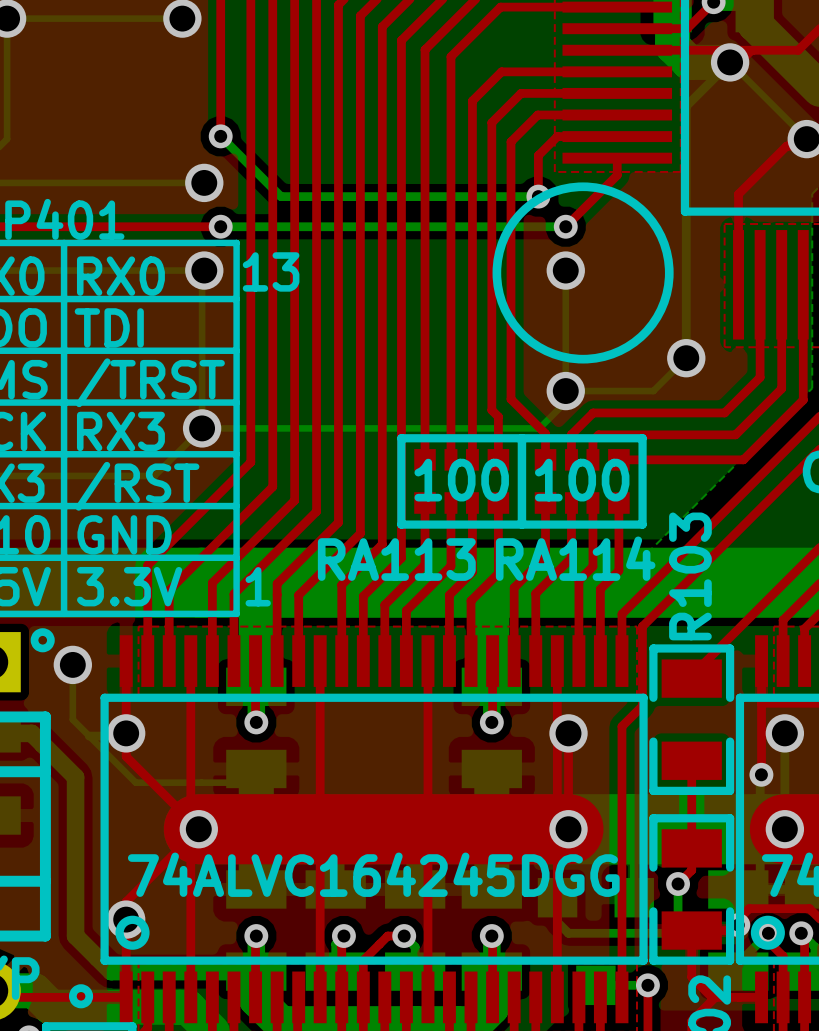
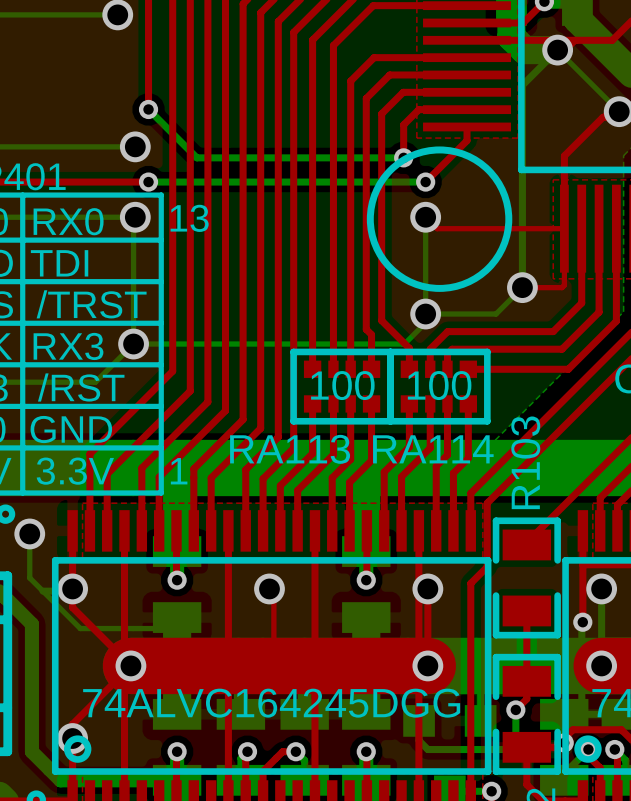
top track: none -> (425, 217) (437, 228) (564, 228) (564, 285) (562, 287) (522, 287)
top track: none -> (269, 588) (273, 593) (273, 665)
via: none -> (269, 588)

